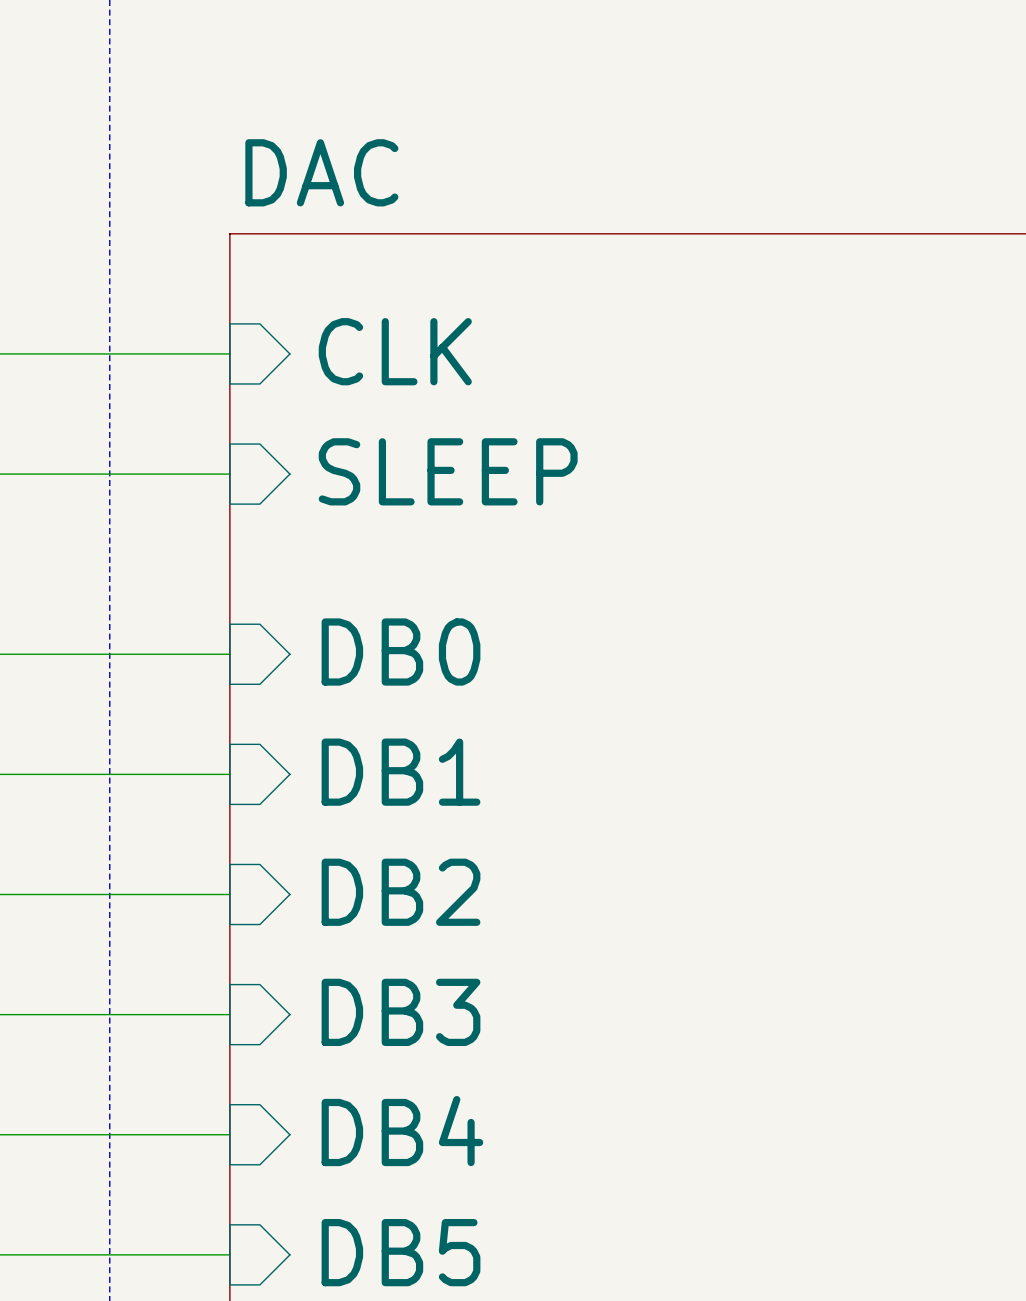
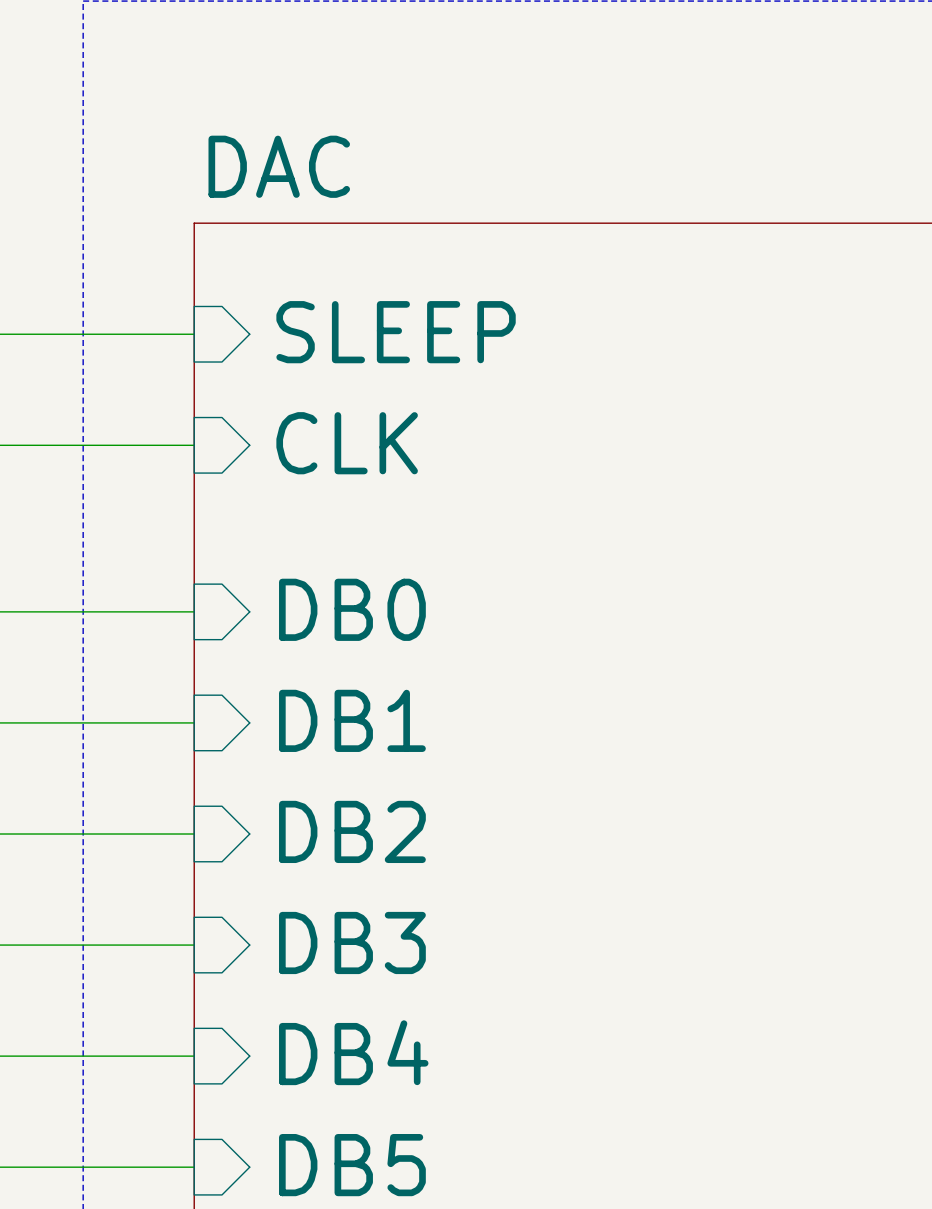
sheet pin: CLK (395, 351) -> SLEEP (396, 332)
sheet pin: SLEEP (448, 471) -> CLK (347, 443)

